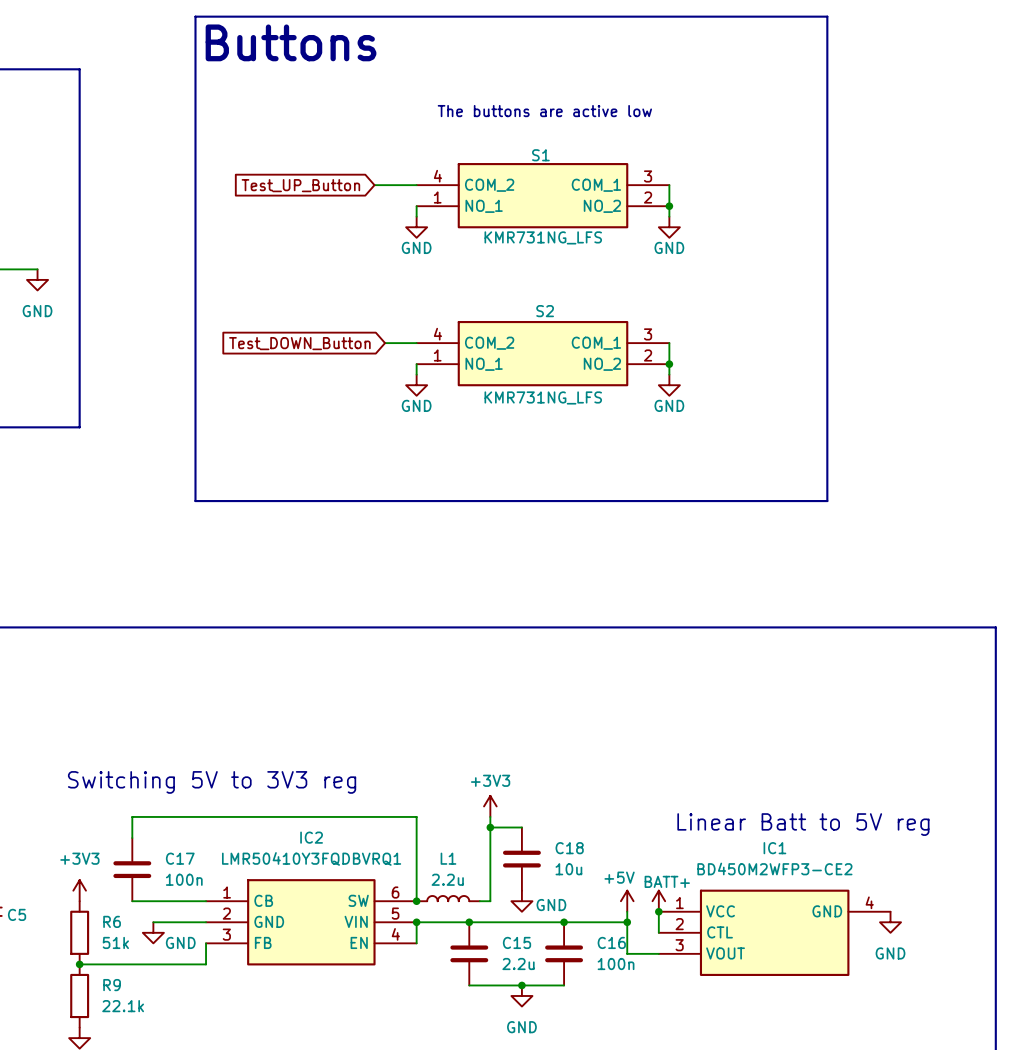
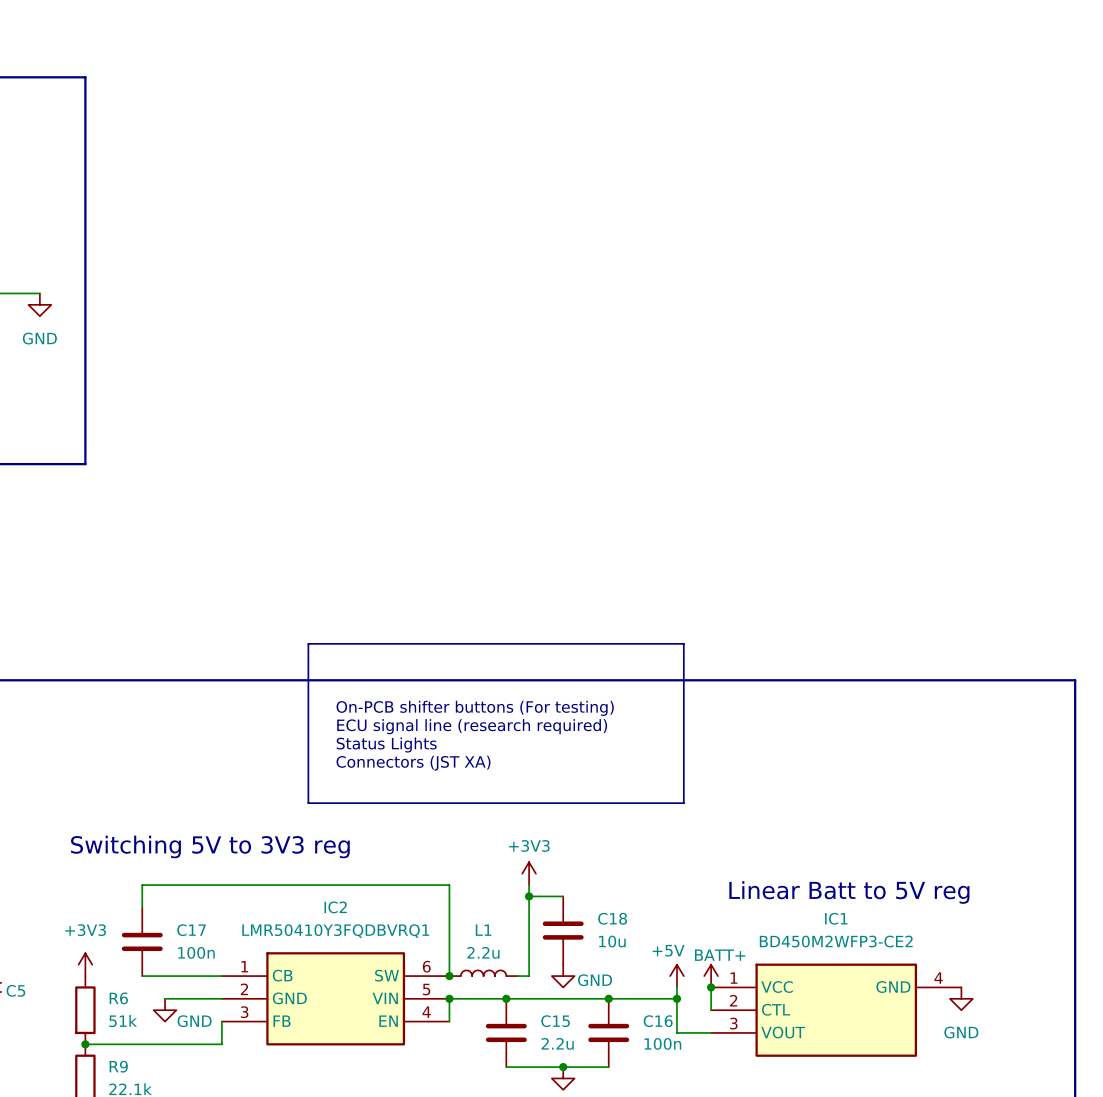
line: (195, 16) (827, 16) (827, 501) (195, 501) (195, 16) -> none
text: Buttons (291, 42) -> none
text: The buttons are active low (544, 111) -> none
global label: Test_UP_Button (300, 185) -> none
wire: (374, 185) (416, 185) -> none
wire: (669, 185) (669, 216) -> none
S1: KMR731NG_LFS (543, 195) -> none
wire: (416, 206) (416, 216) -> none
junction: (669, 206) -> none
power symbol: GND (416, 227) -> none
power symbol: GND (669, 227) -> none
global label: Test_DOWN_Button (299, 343) -> none
wire: (385, 343) (416, 343) -> none
wire: (669, 343) (669, 374) -> none
S2: KMR731NG_LFS (543, 353) -> none
wire: (416, 364) (416, 374) -> none
junction: (669, 364) -> none
power symbol: GND (416, 385) -> none
power symbol: GND (669, 385) -> none
line: none -> (308, 643) (683, 643) (683, 803) (308, 803) (308, 643)
text: none -> On-PCB shifter buttons (For testing) (475, 708)
text: none -> ECU signal line (research required) (472, 726)
text: none -> Status Lights (386, 744)
text: none -> Connectors (JST XA) (413, 763)

